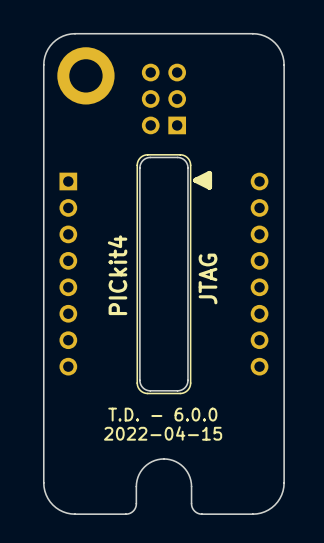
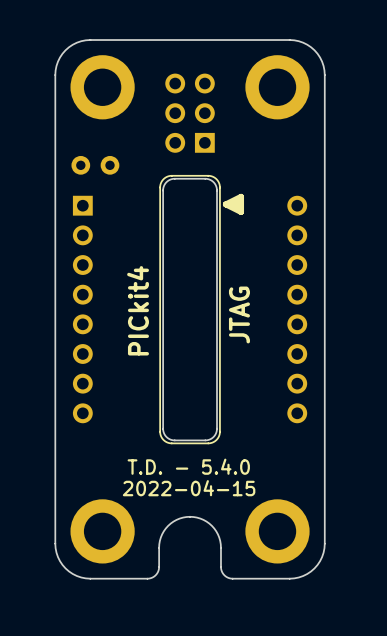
part: none -> (277, 87)
part: none -> (95, 165)
text: T.D. - 6.0.0 (162, 414) -> T.D. - 5.4.0 (188, 466)
part: none -> (102, 531)
part: none -> (277, 531)

